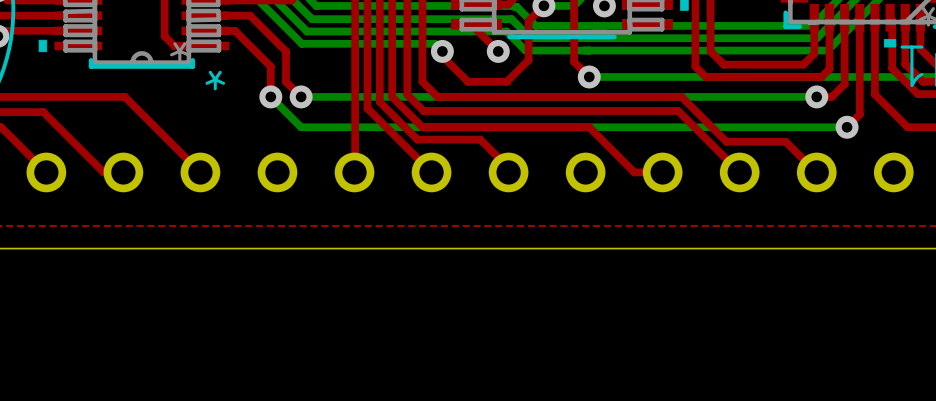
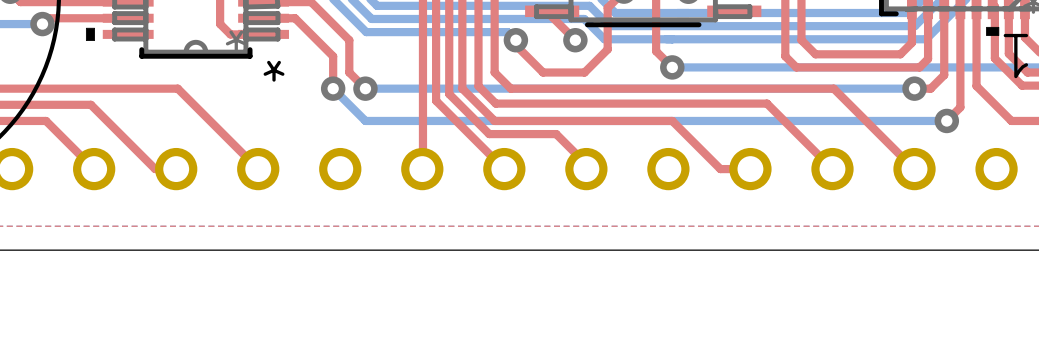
top track: (681, 96) (726, 141) (785, 141) -> (770, 88) (833, 88) (881, 136)

